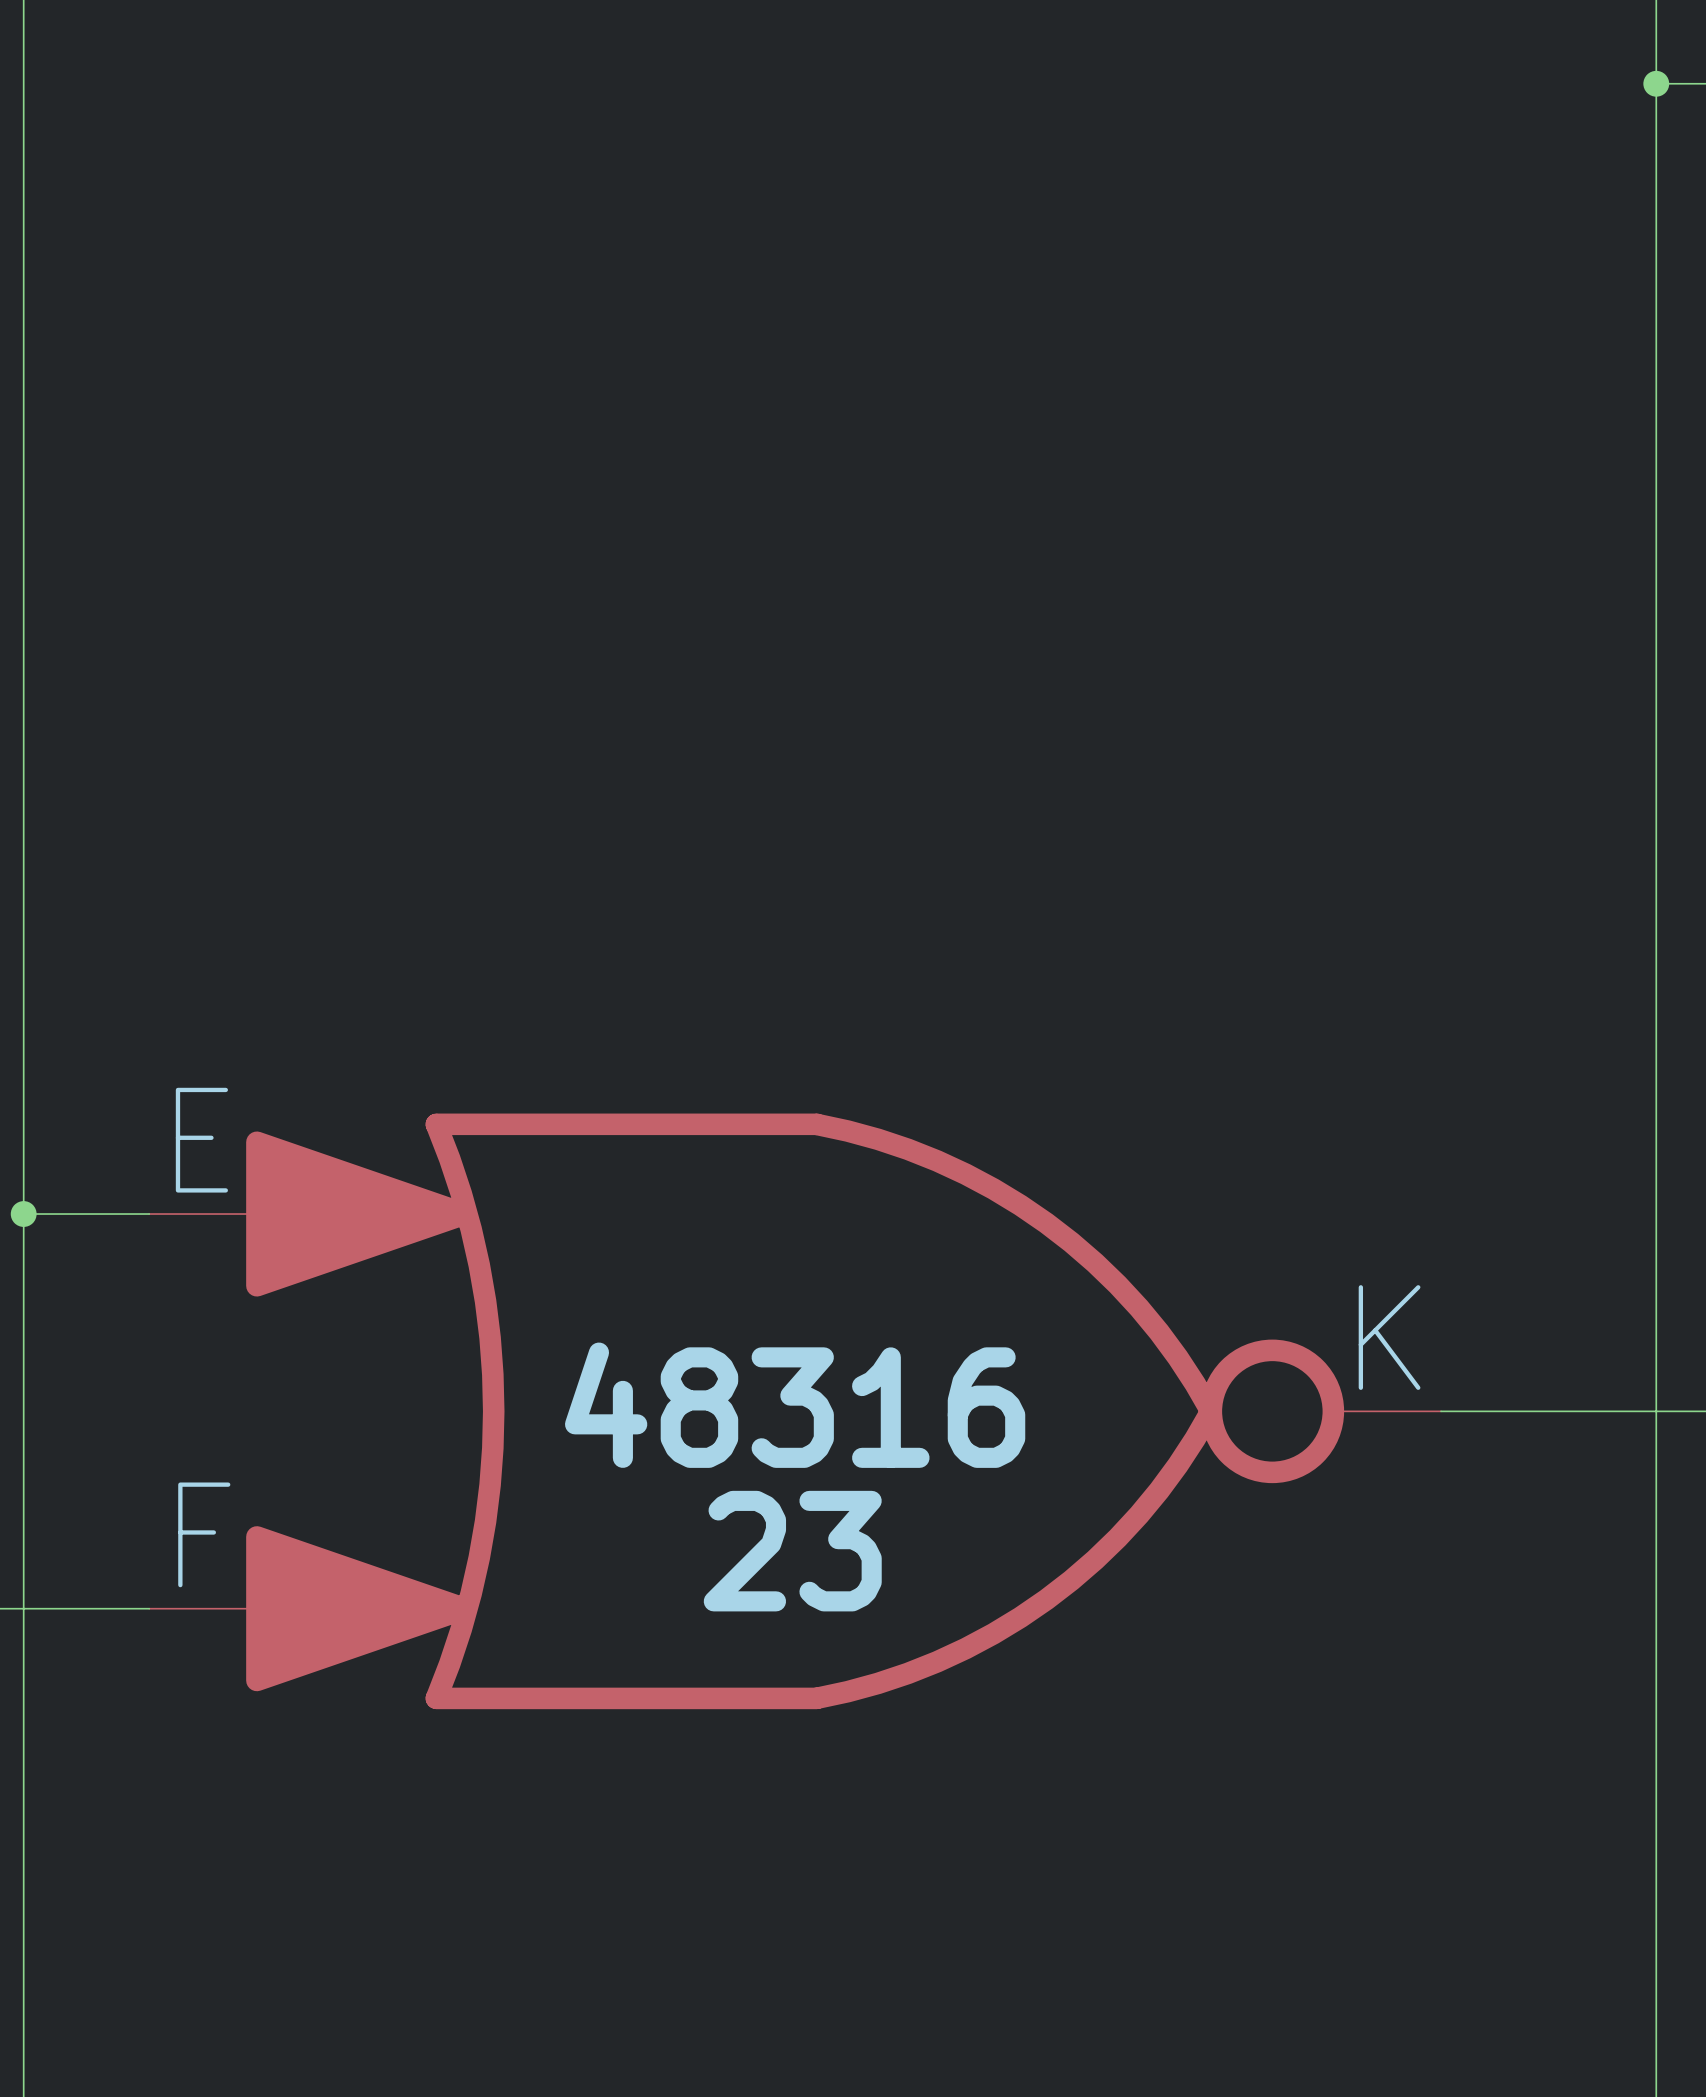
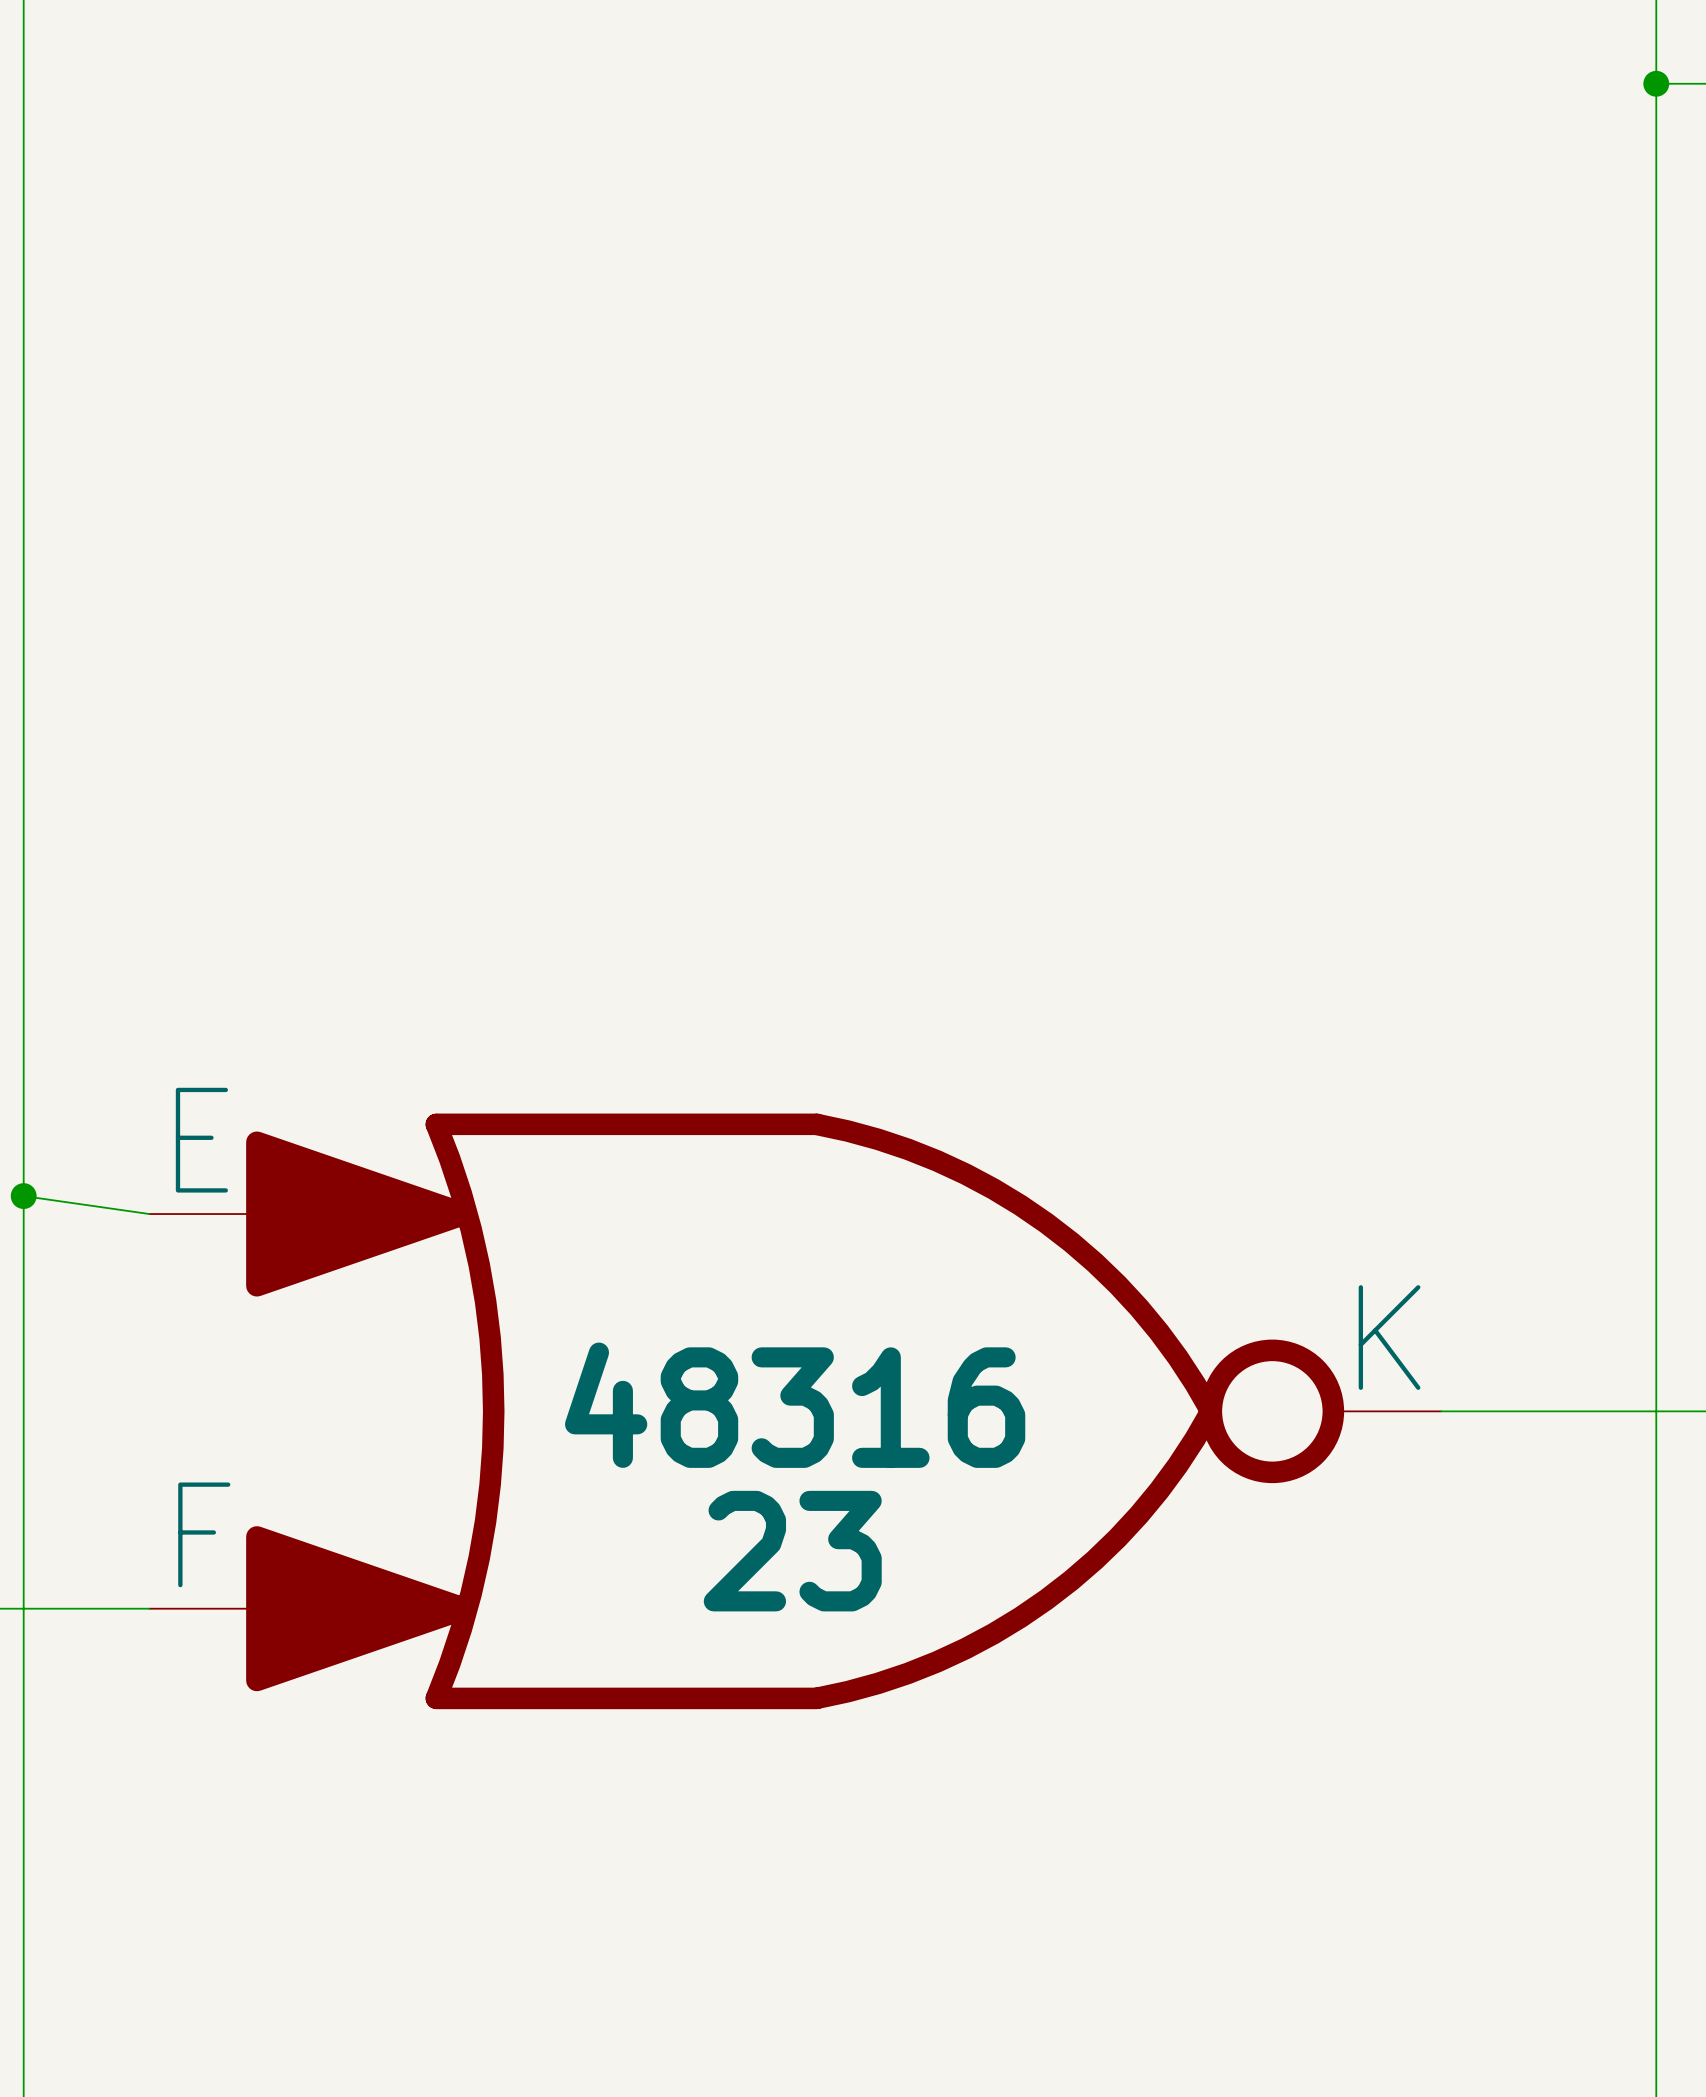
wire: (23, 1214) (149, 1214) -> (23, 1196) (149, 1214)
junction position: (23, 1214) -> (23, 1196)

